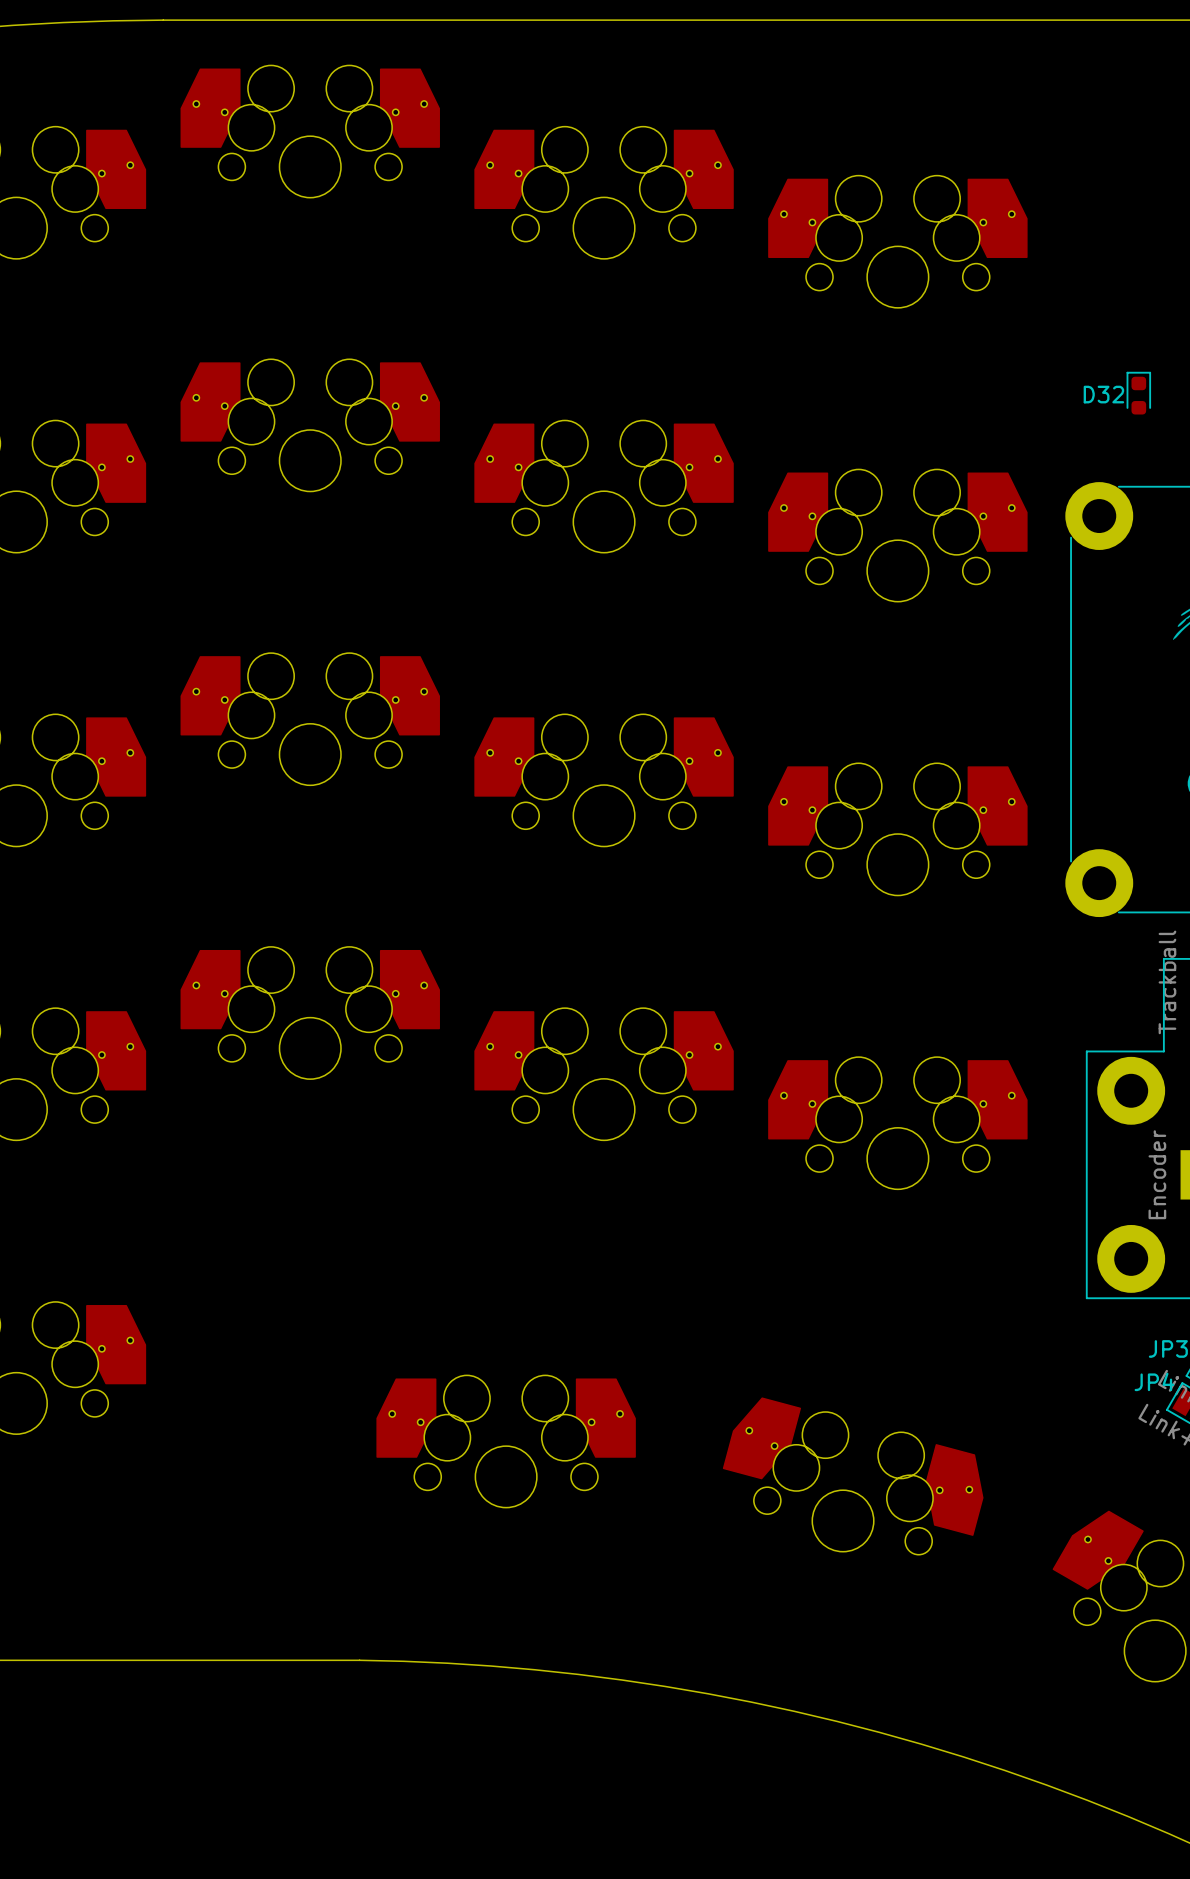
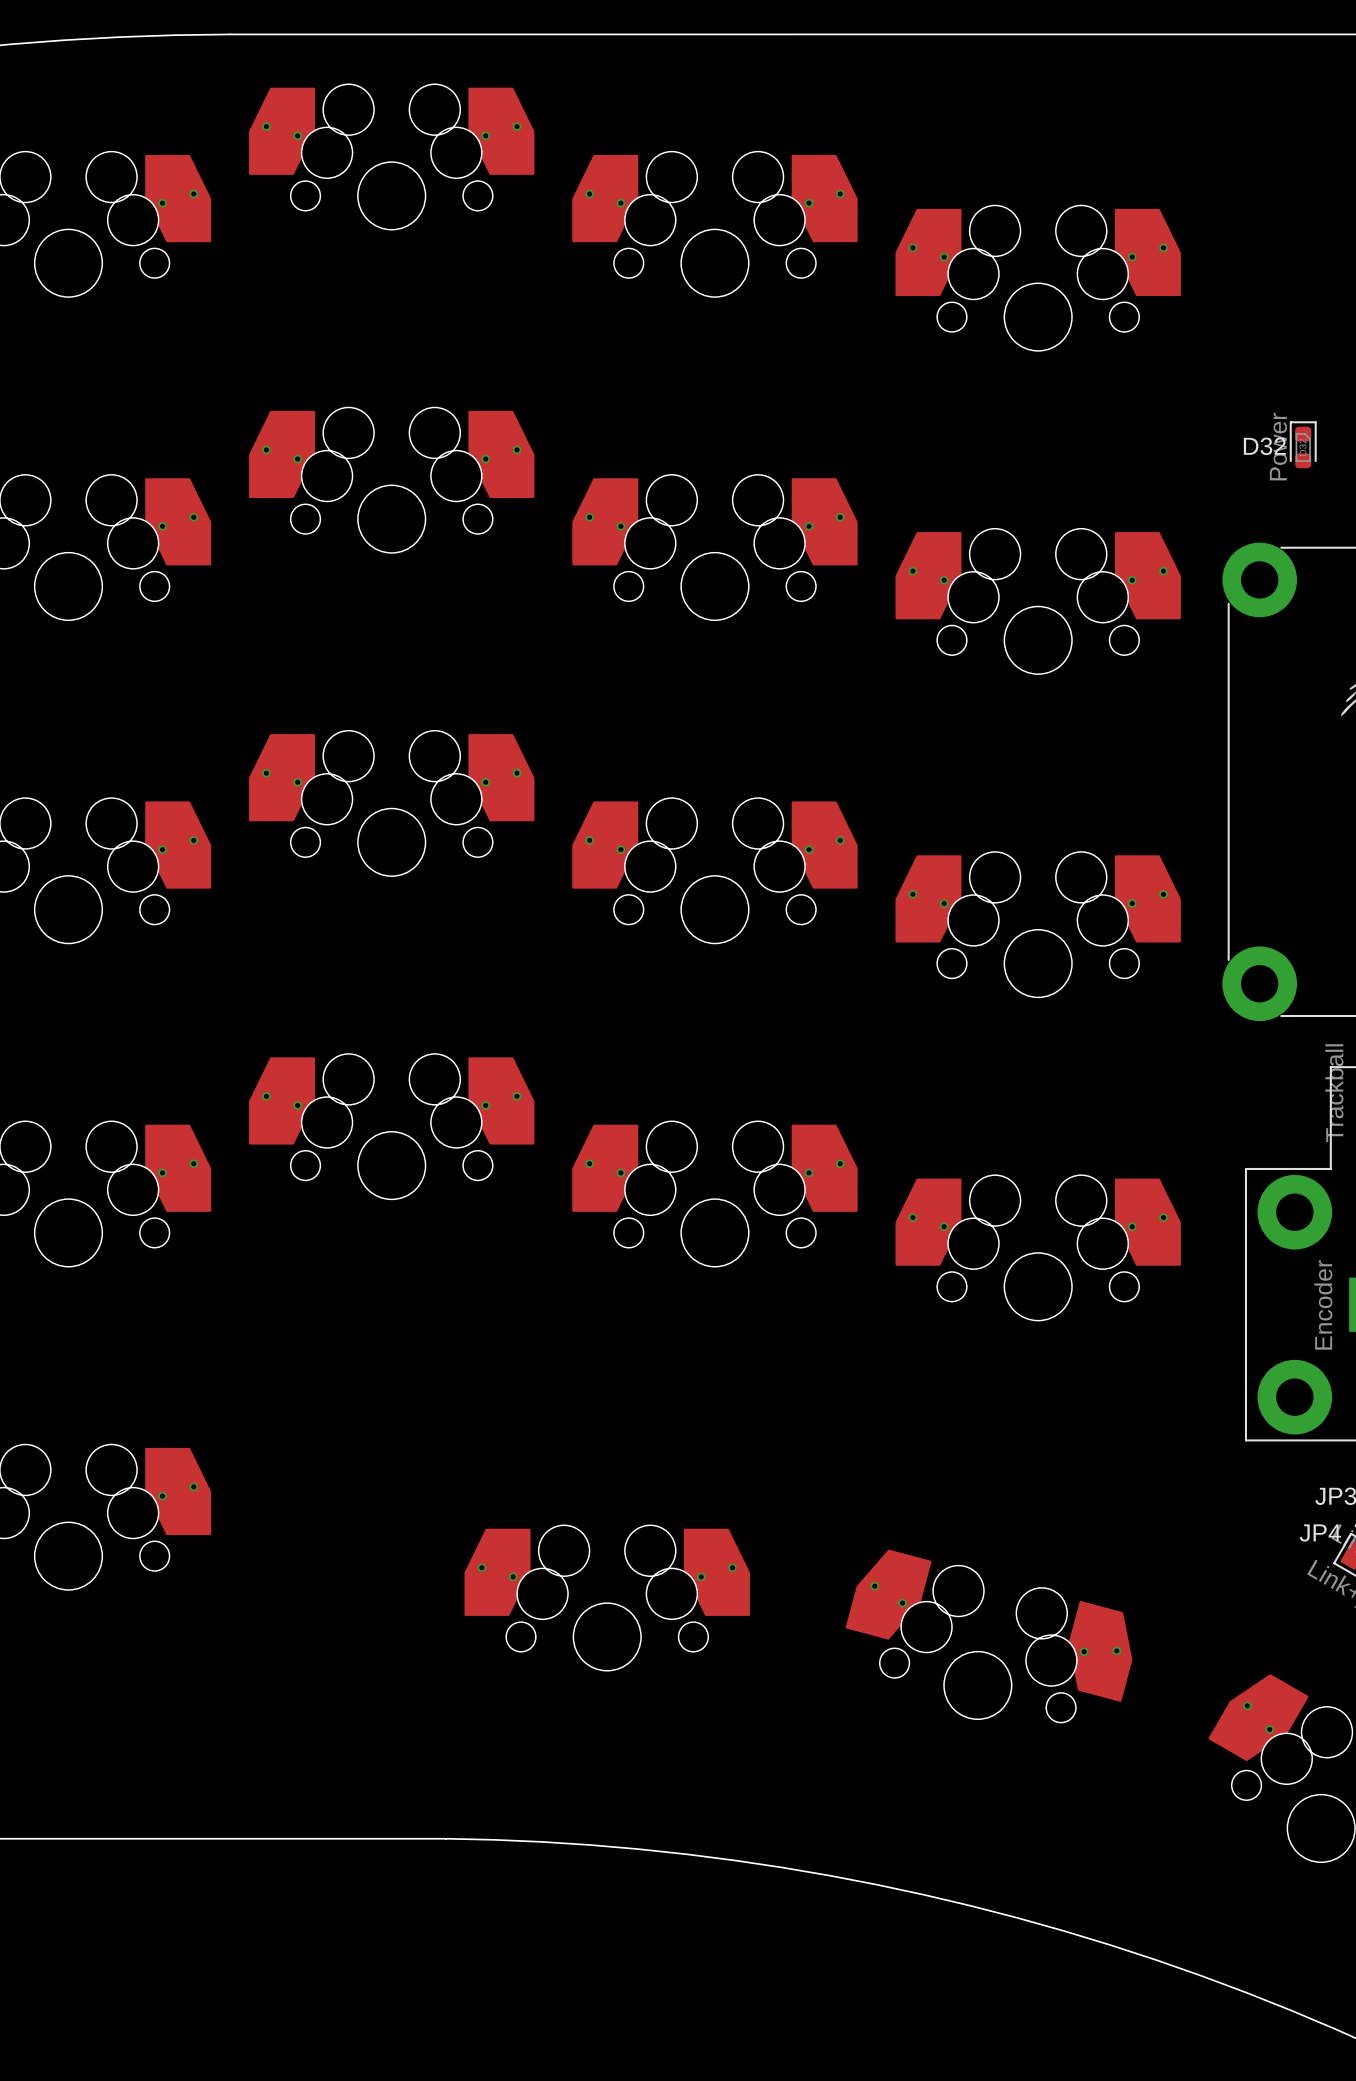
D32 side: bottom (1138, 393) -> top (1303, 444)
text: none -> D32 (1264, 446)

